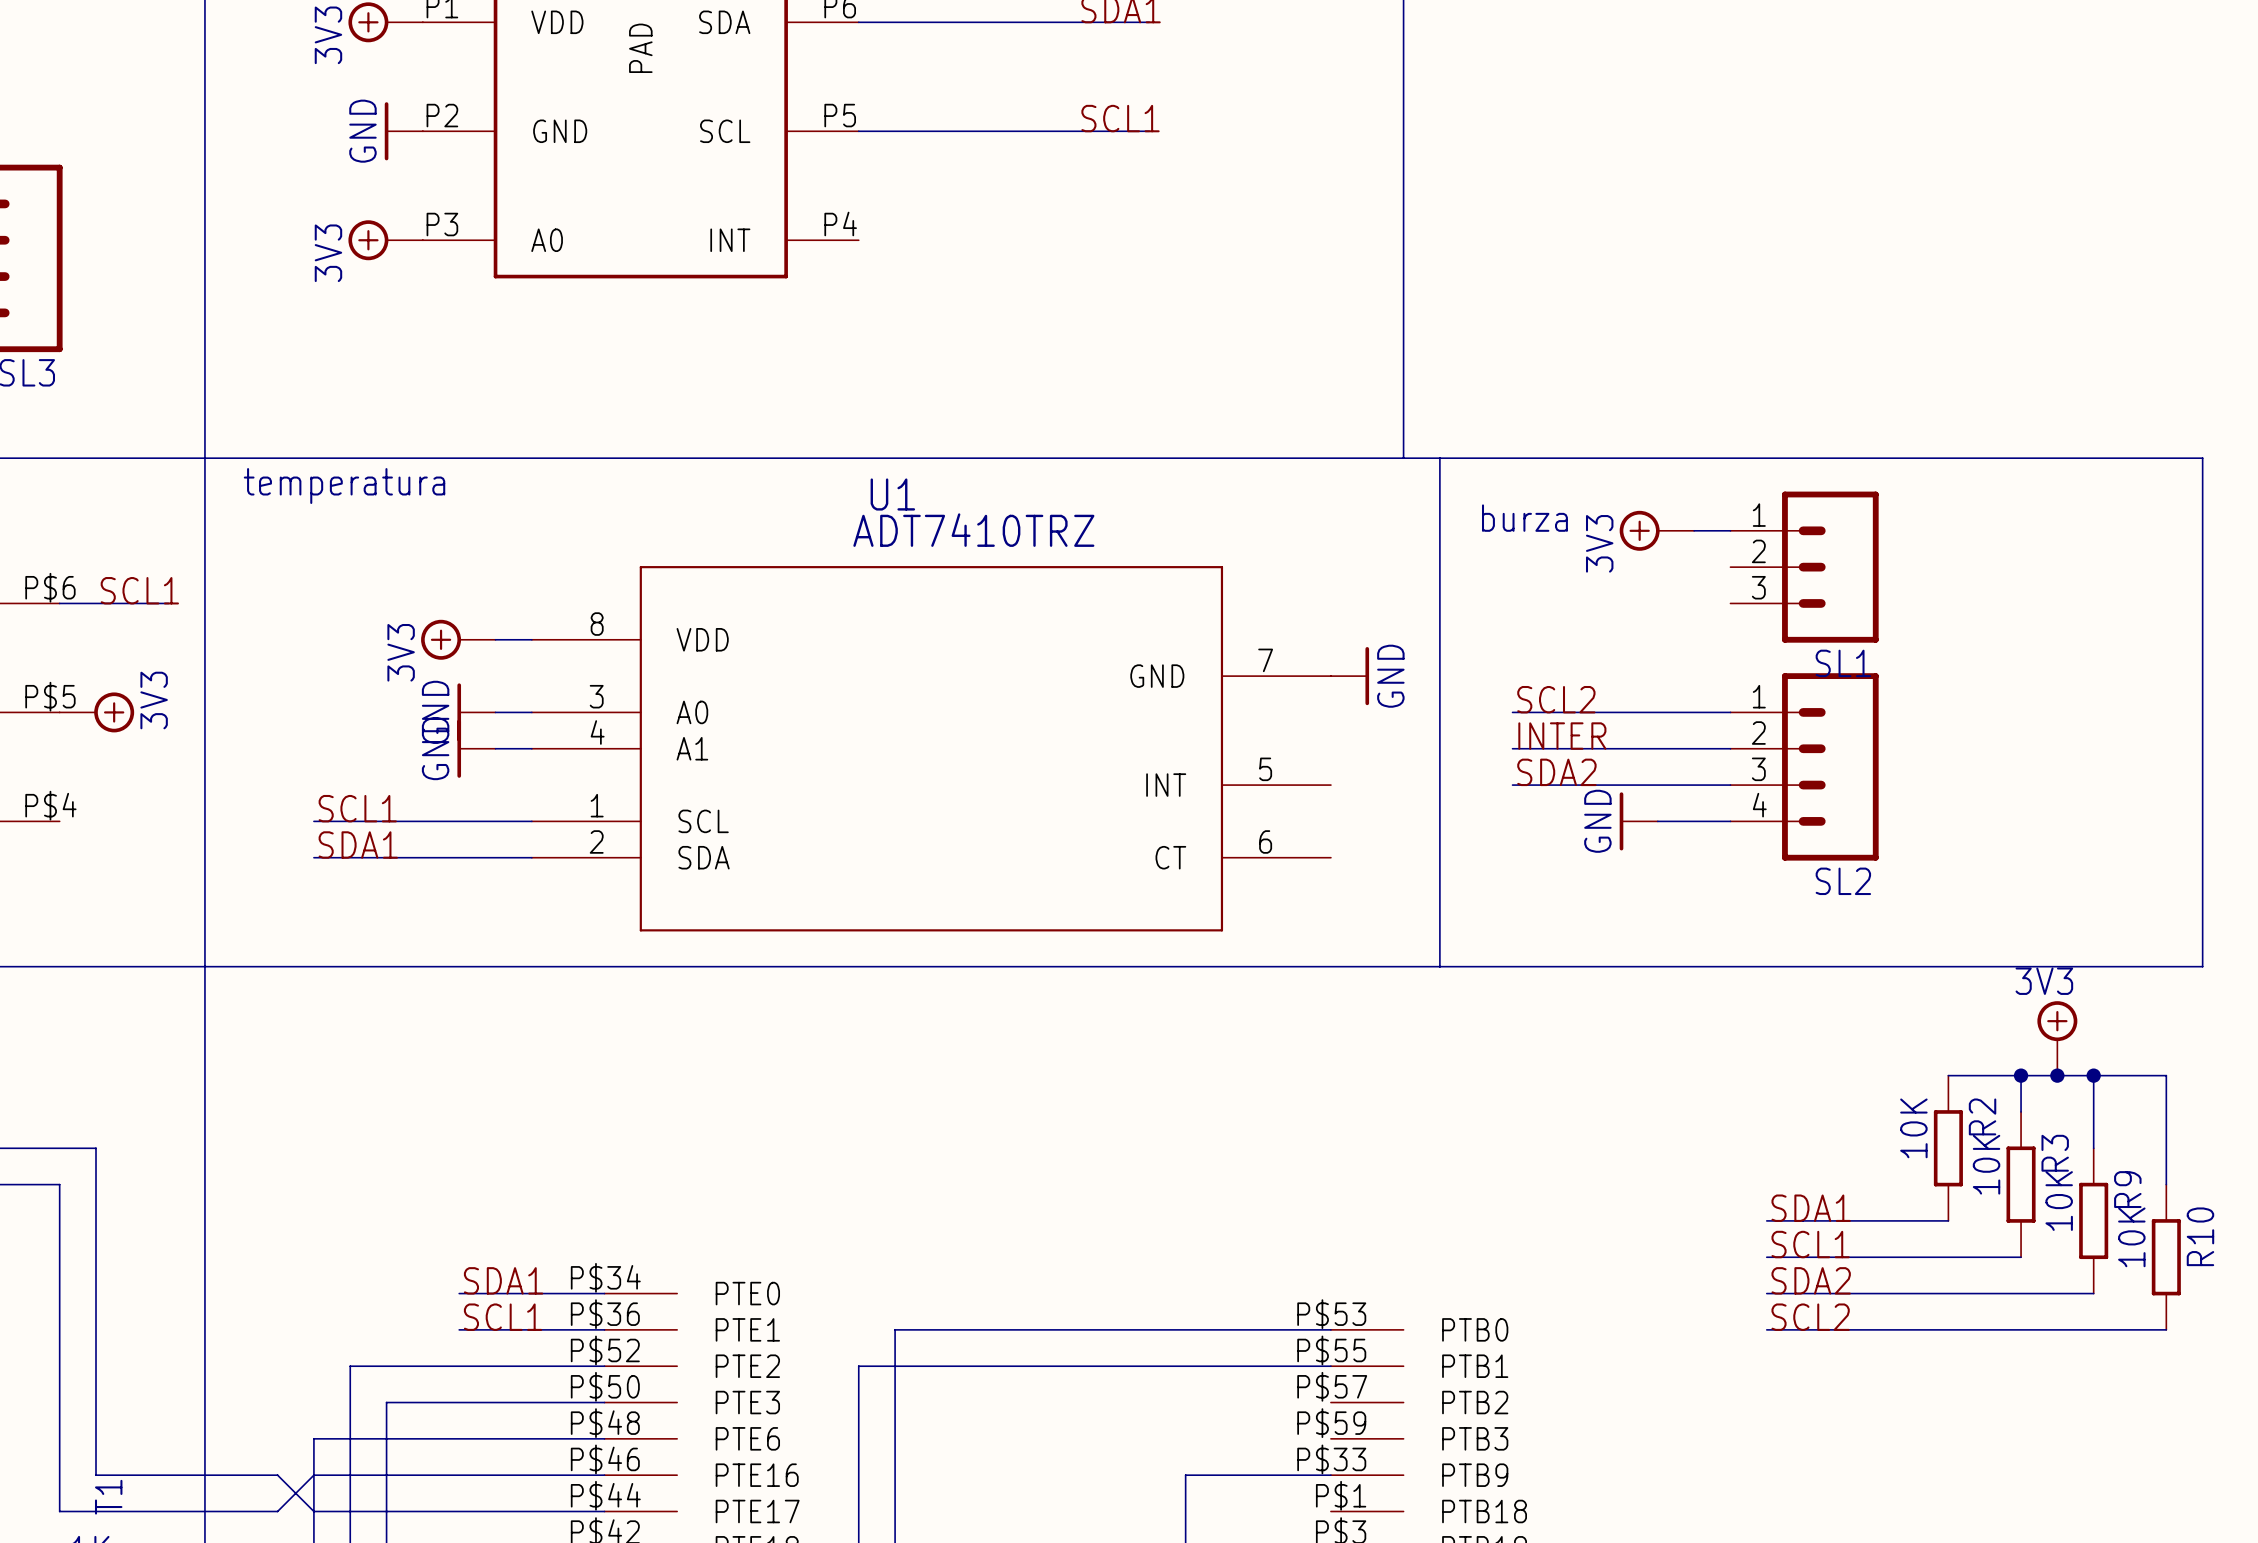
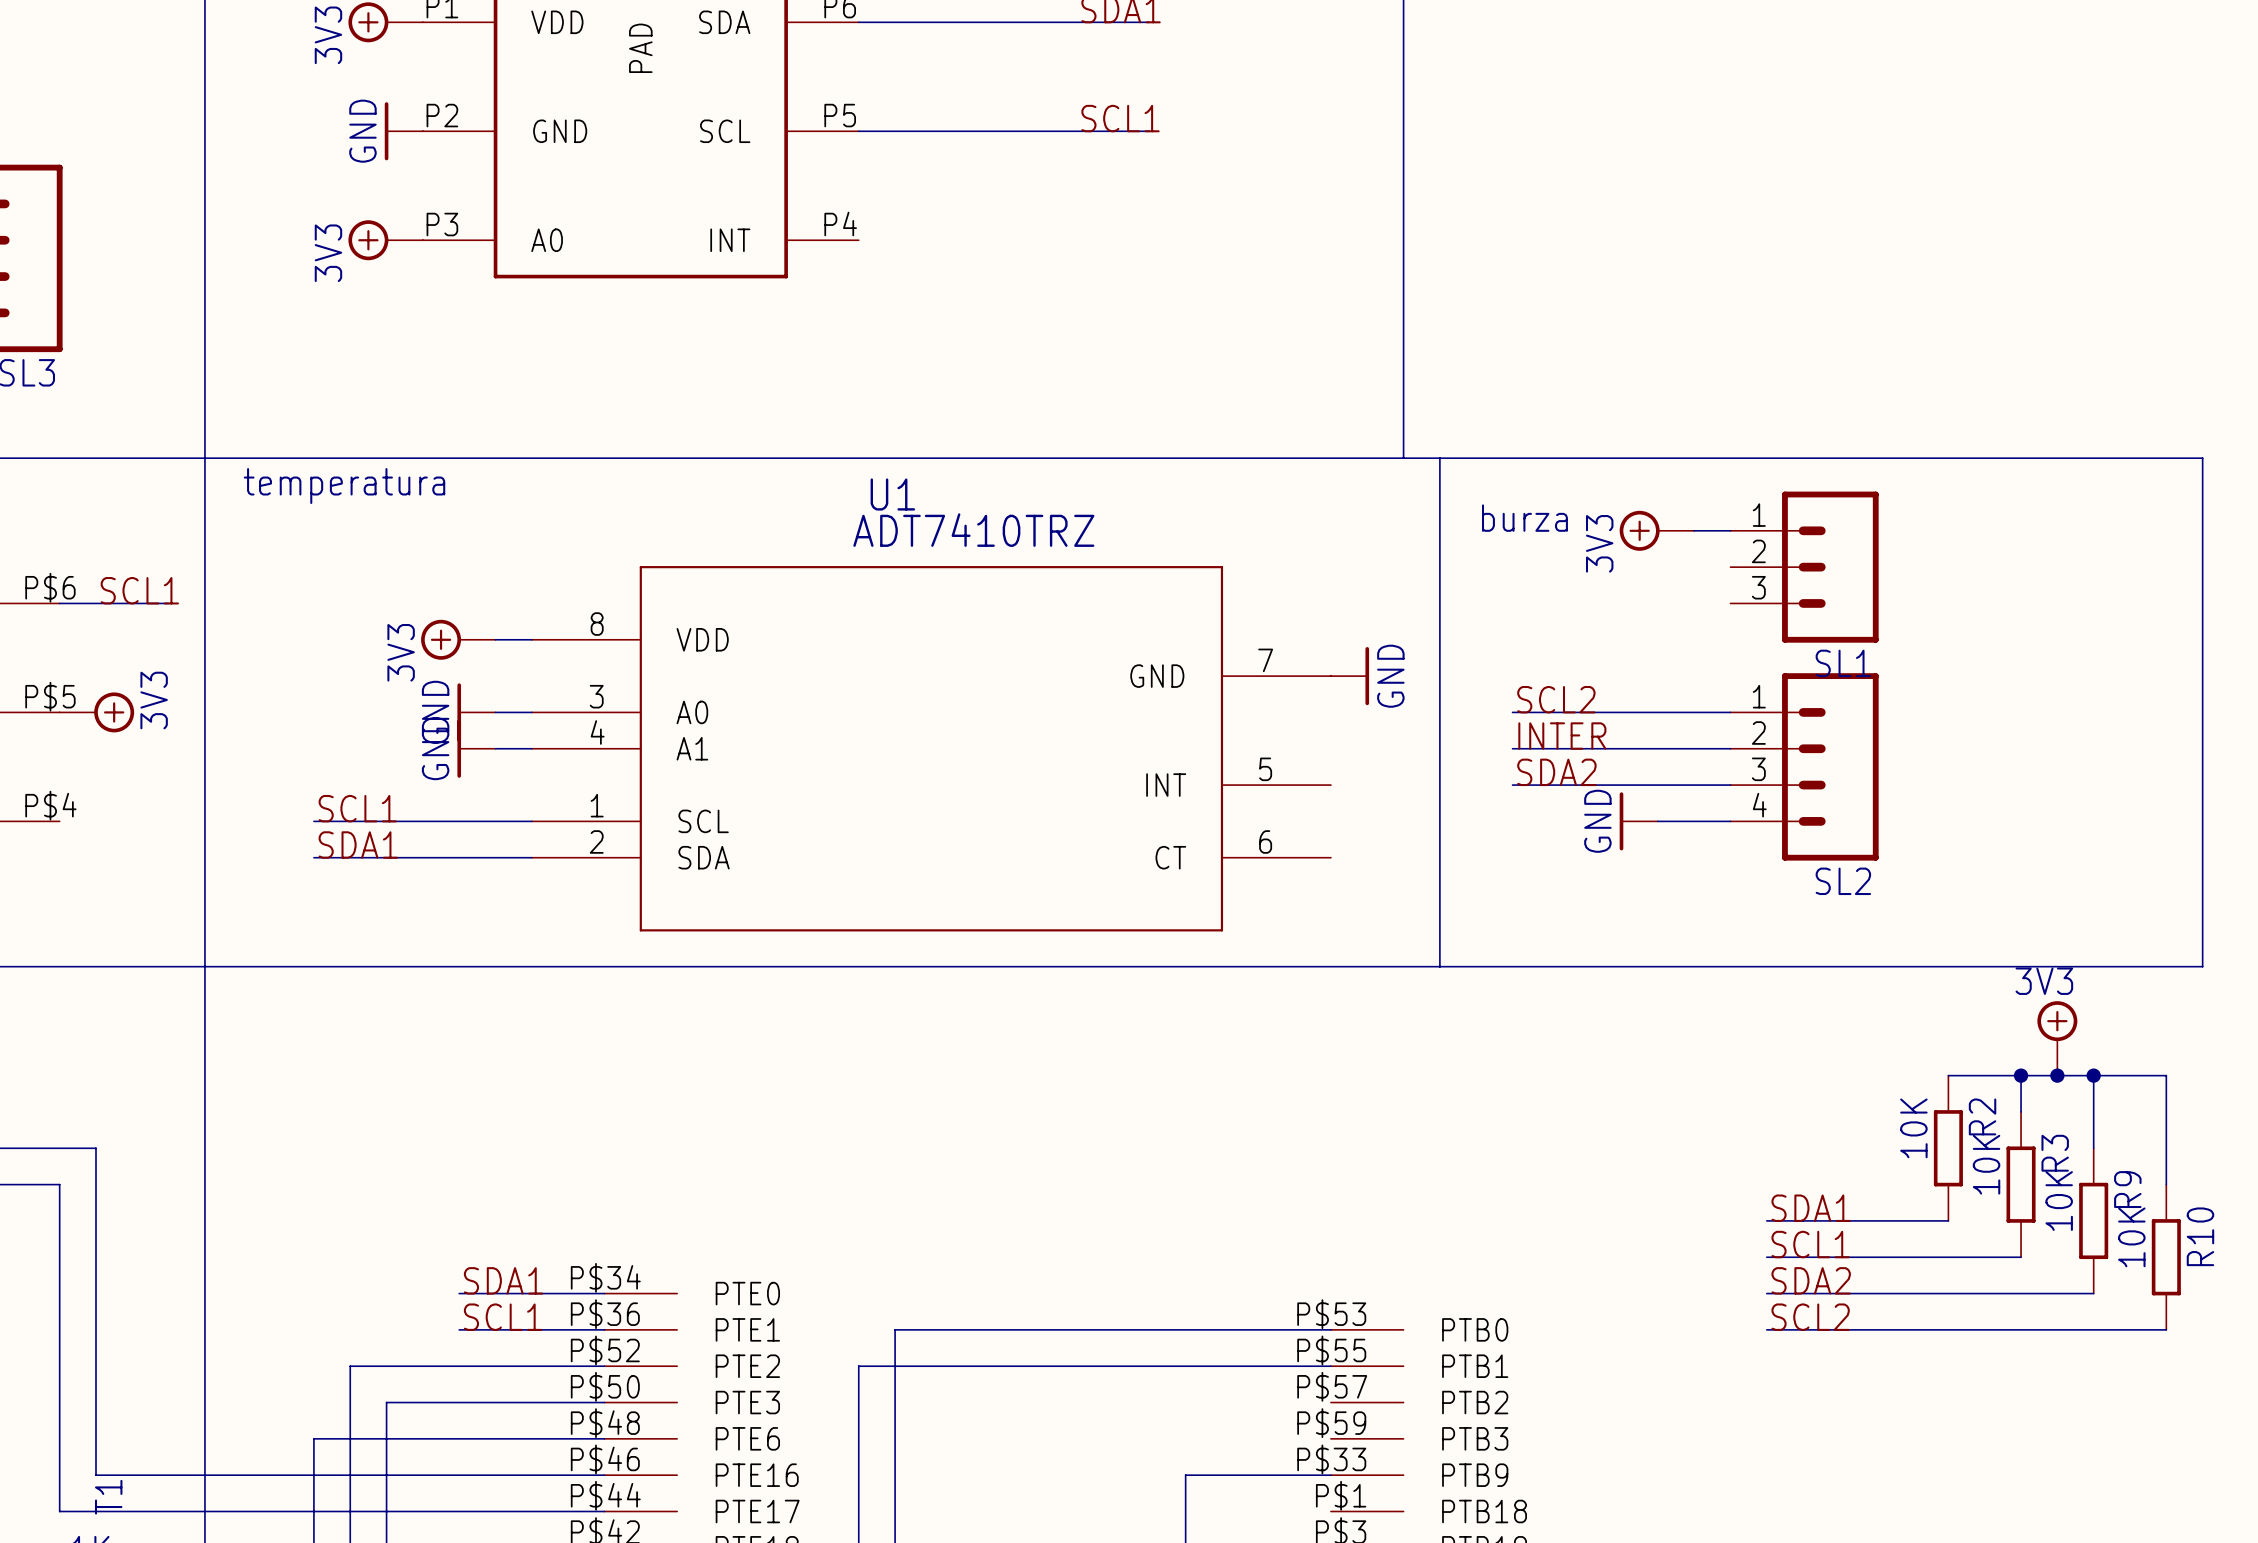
wire: (277, 1475) (313, 1511) -> (277, 1475) (313, 1475)
wire: (313, 1475) (277, 1511) -> (313, 1511) (277, 1511)

